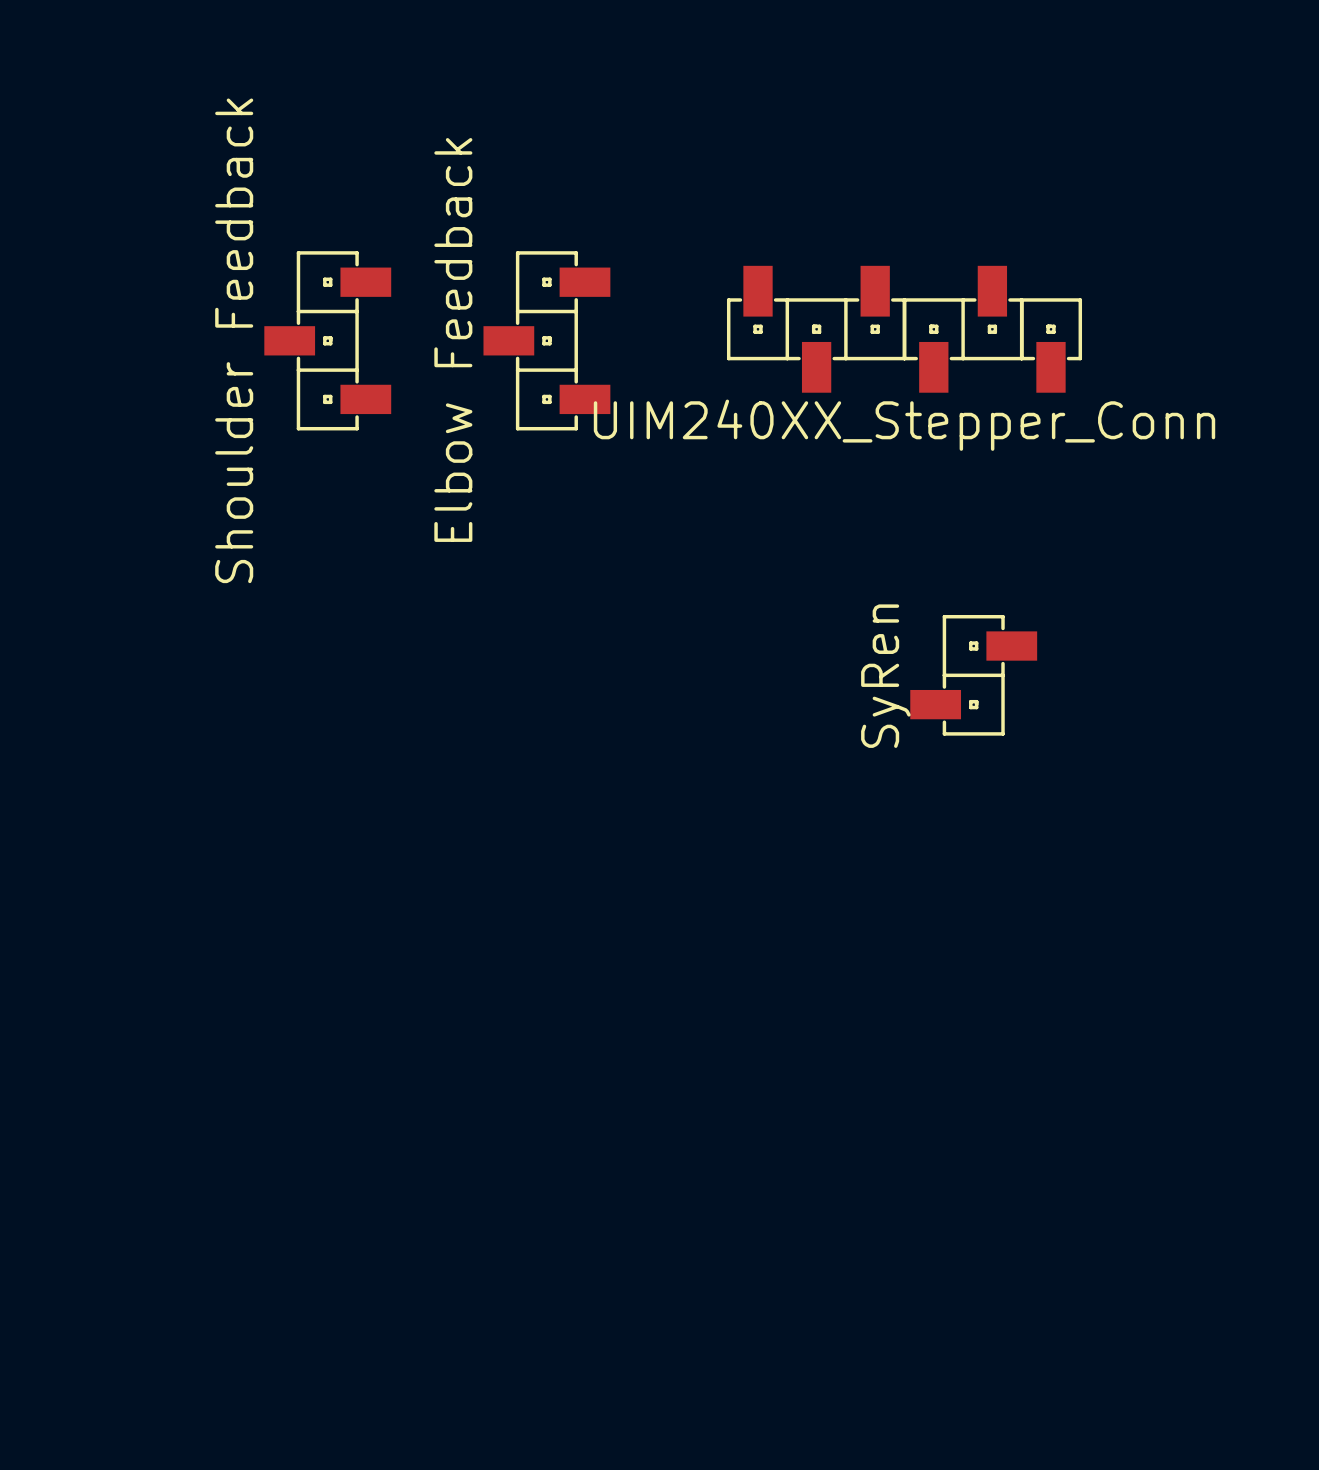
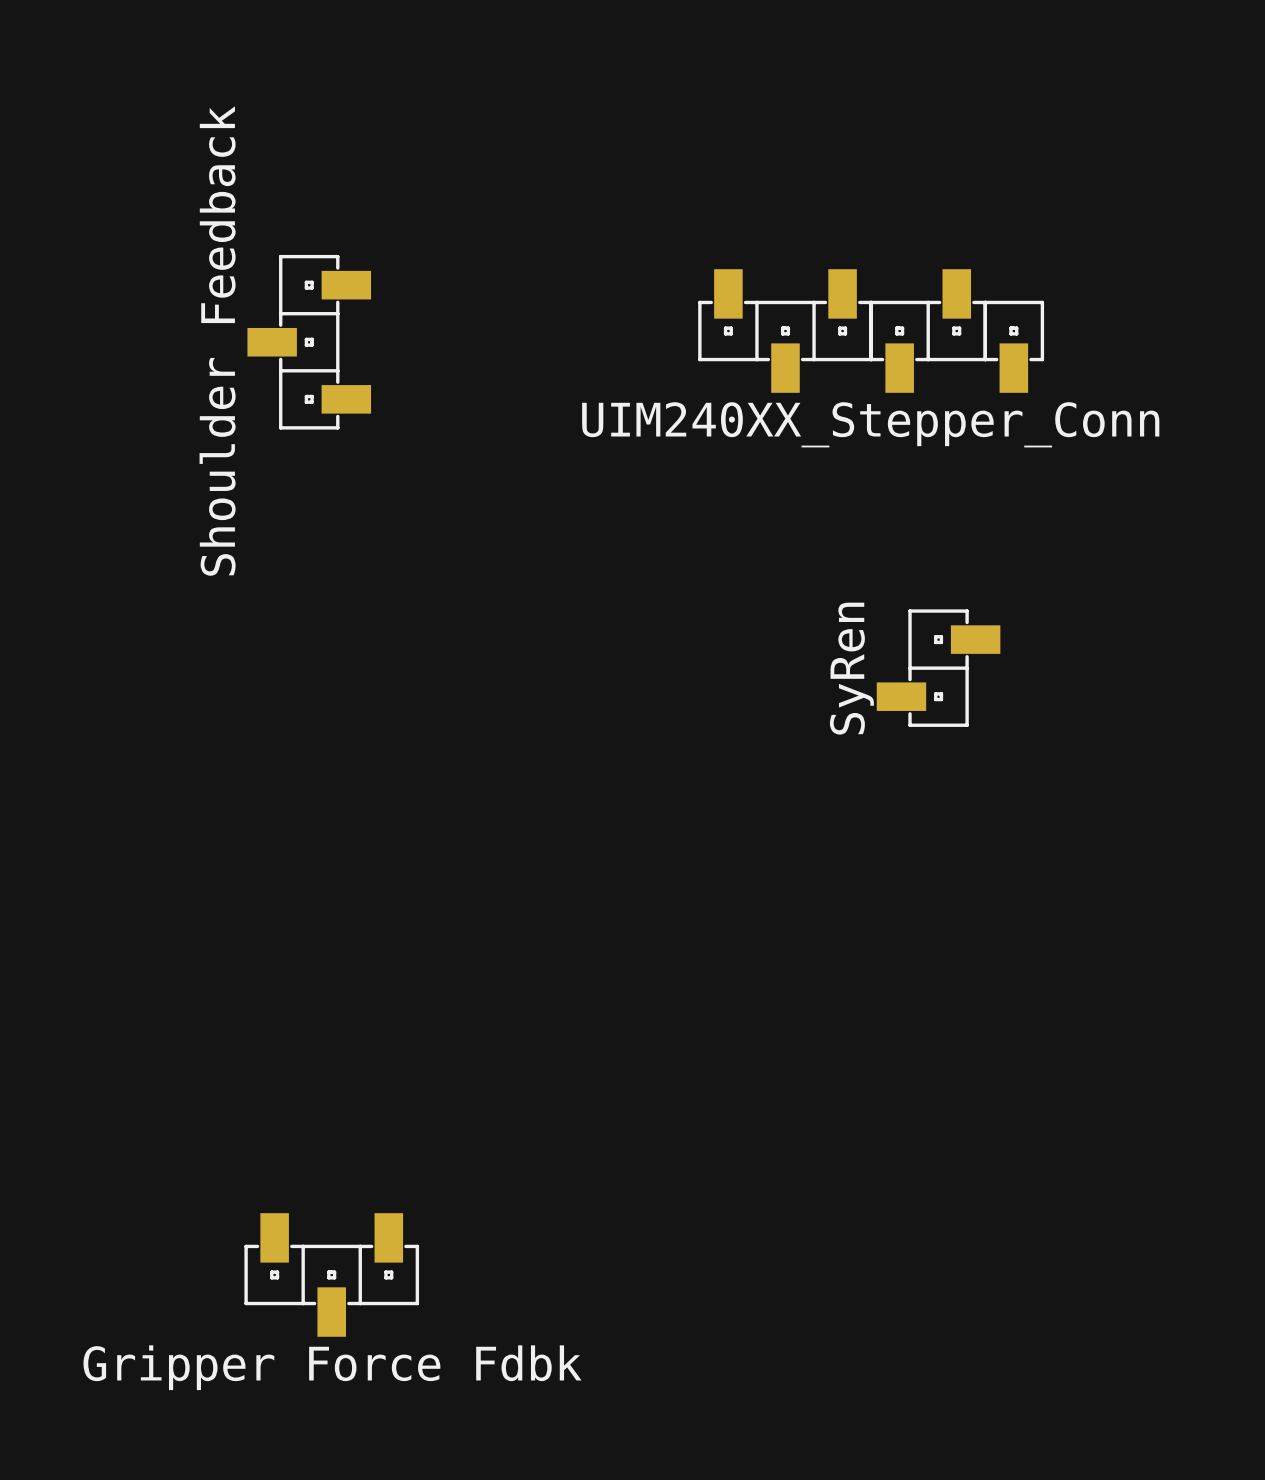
part: Elbow Feedback (546, 340) -> none
part: none -> Gripper Force Fdbk (331, 1274)

